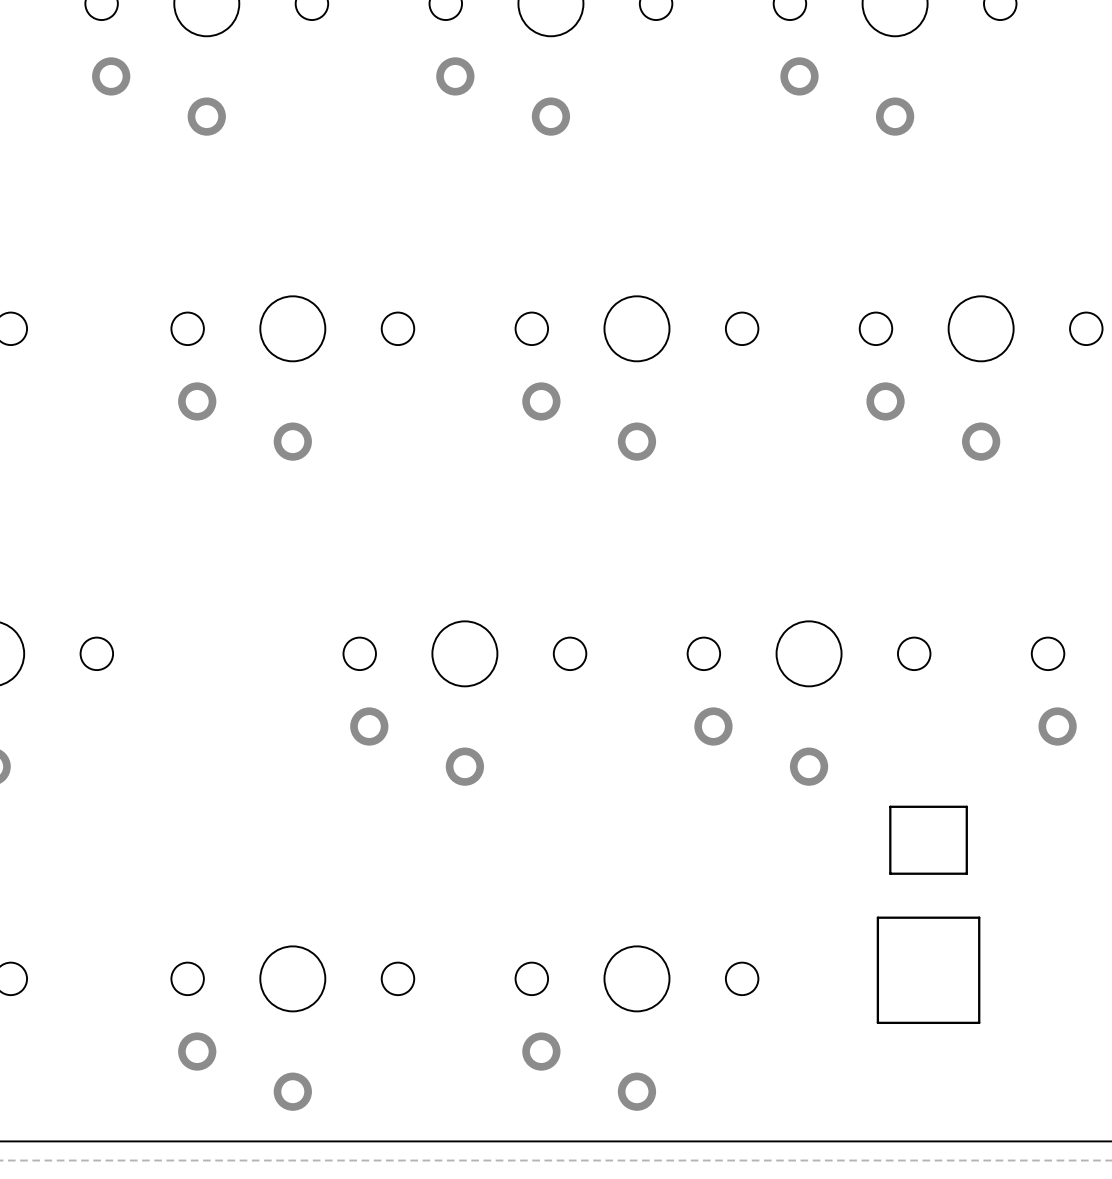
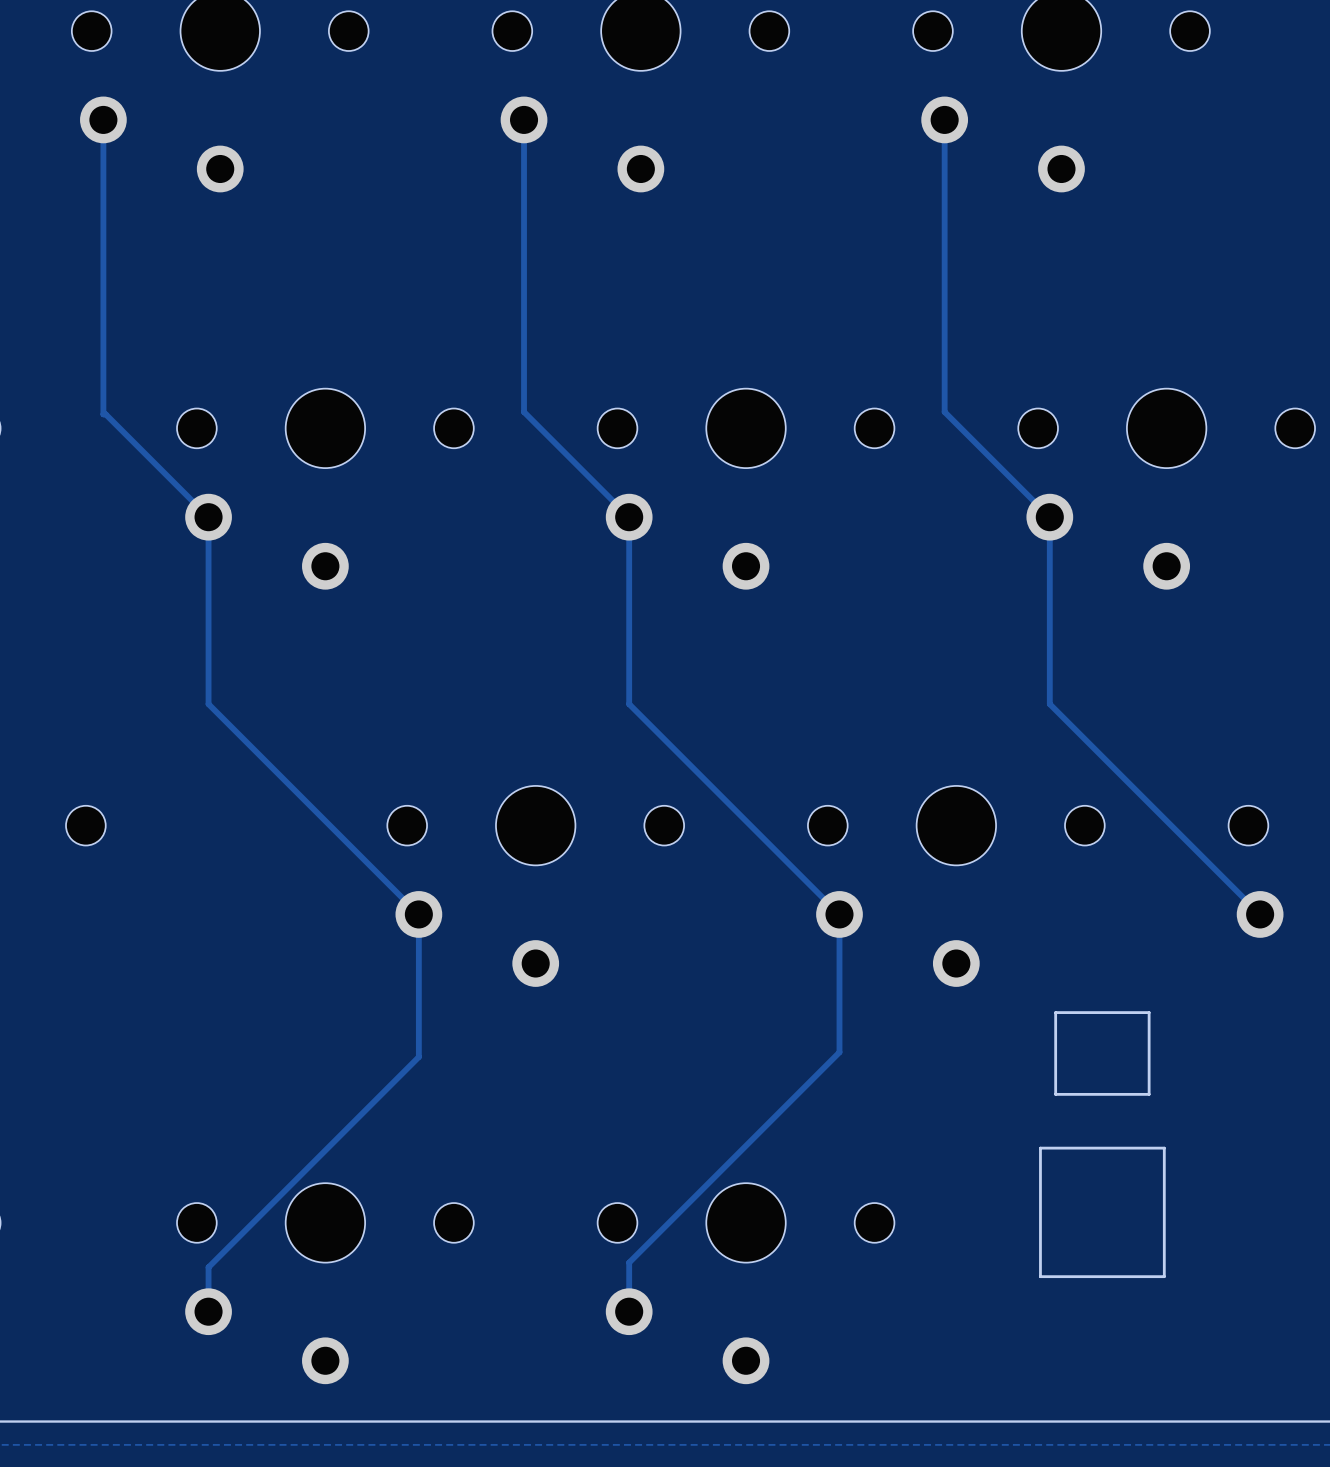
track: none -> (103, 119) (103, 414) (105, 414) (208, 517) (208, 704) (418, 914) (418, 1056) (208, 1267) (208, 1311)
track: none -> (524, 119) (524, 412) (629, 517) (629, 704) (839, 914) (839, 1052) (629, 1262) (629, 1311)
track: none -> (944, 119) (944, 412) (1049, 517) (1049, 704) (1260, 914)

